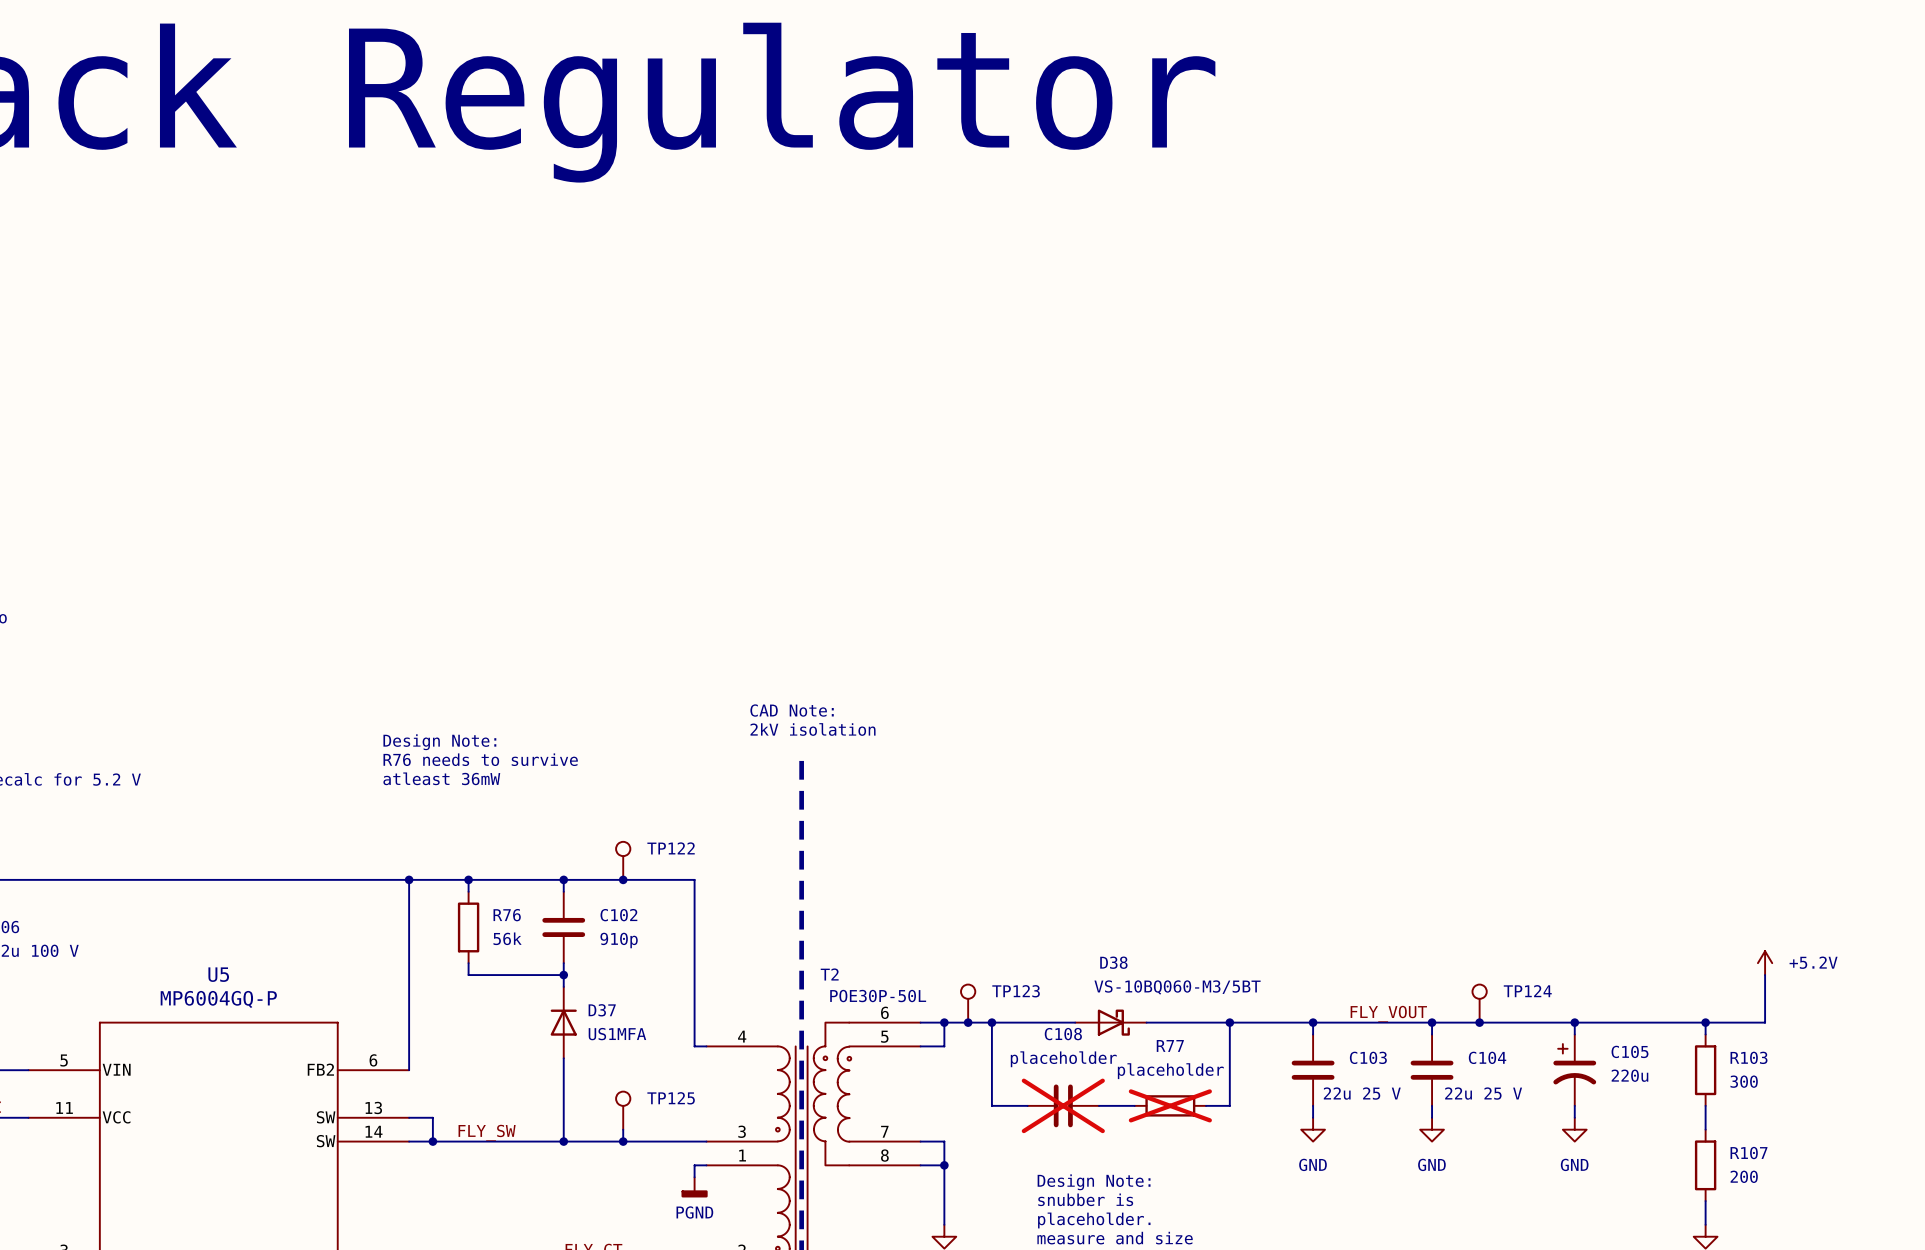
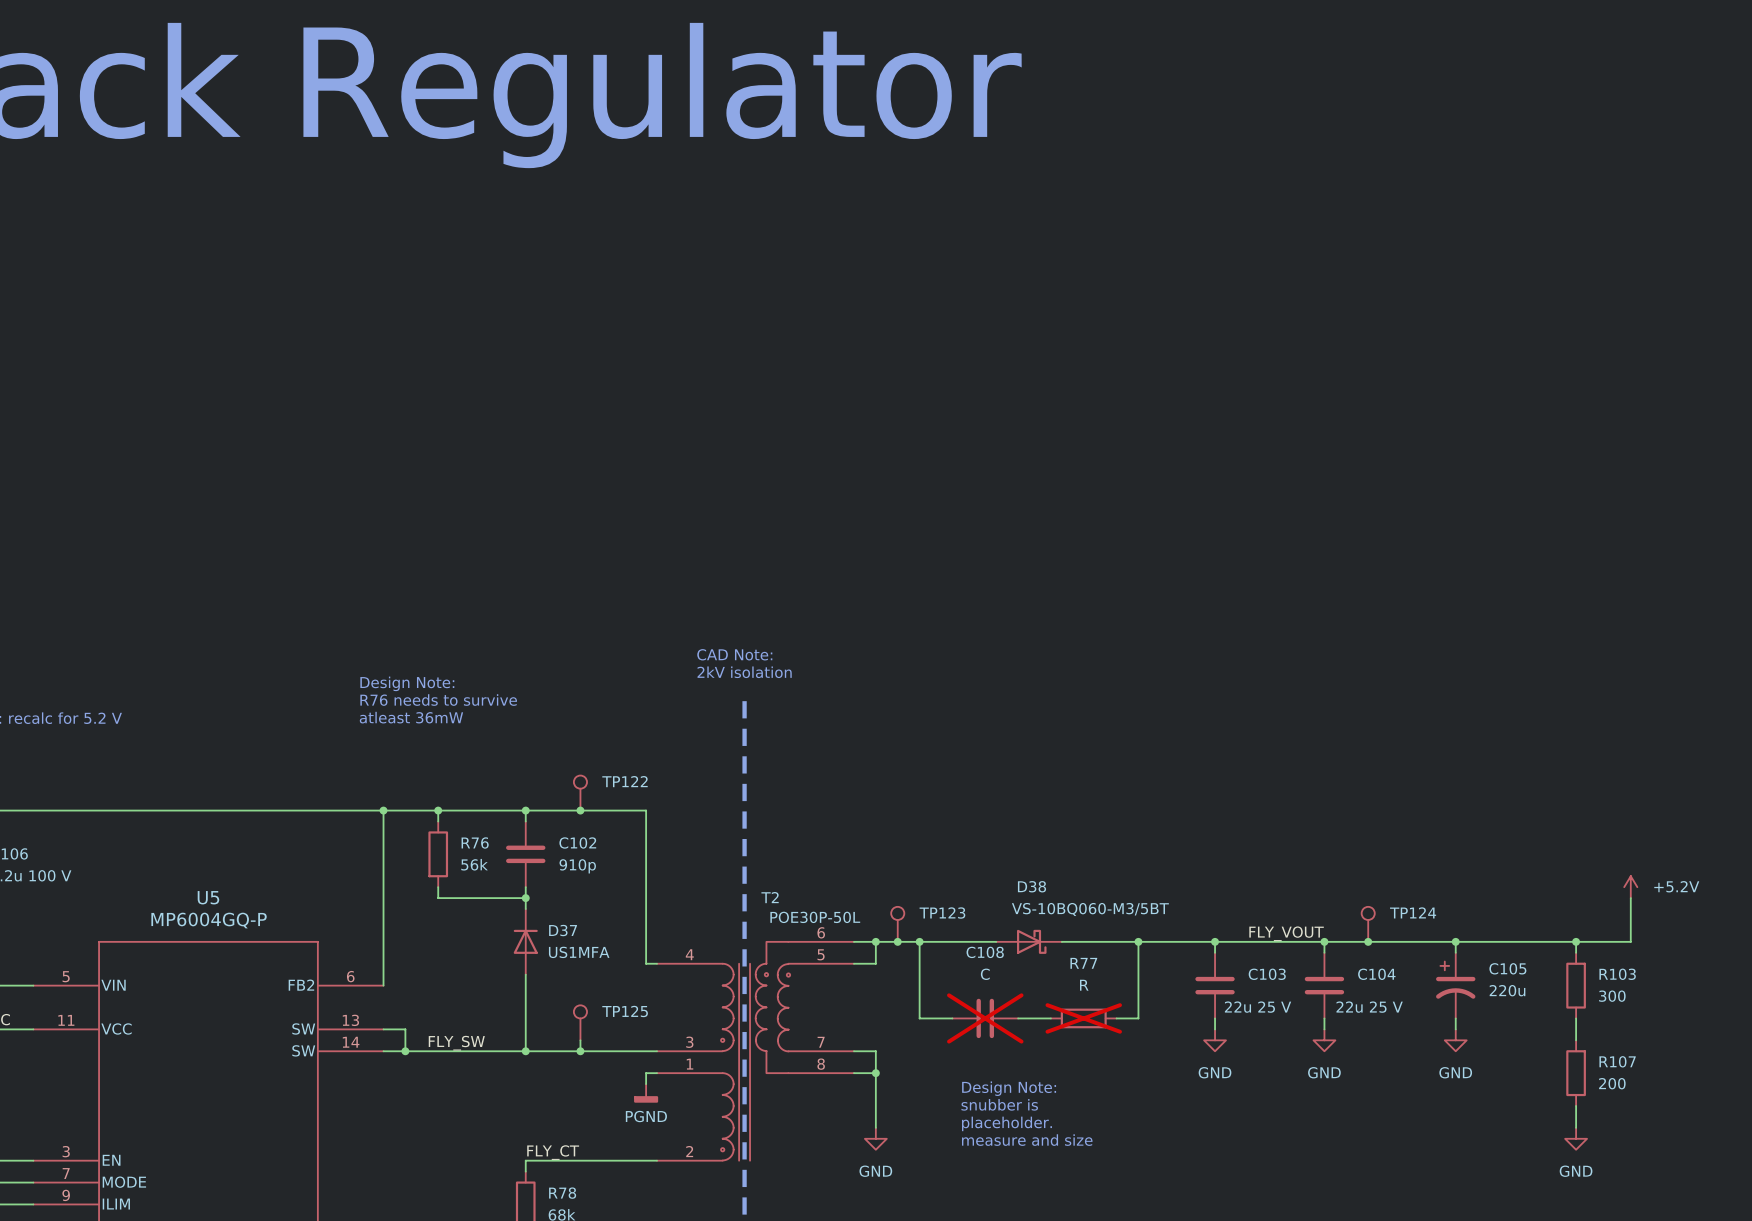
C108 value: placeholder (1063, 1059) -> C (985, 974)
R77 value: placeholder (1170, 1071) -> R (1084, 985)

